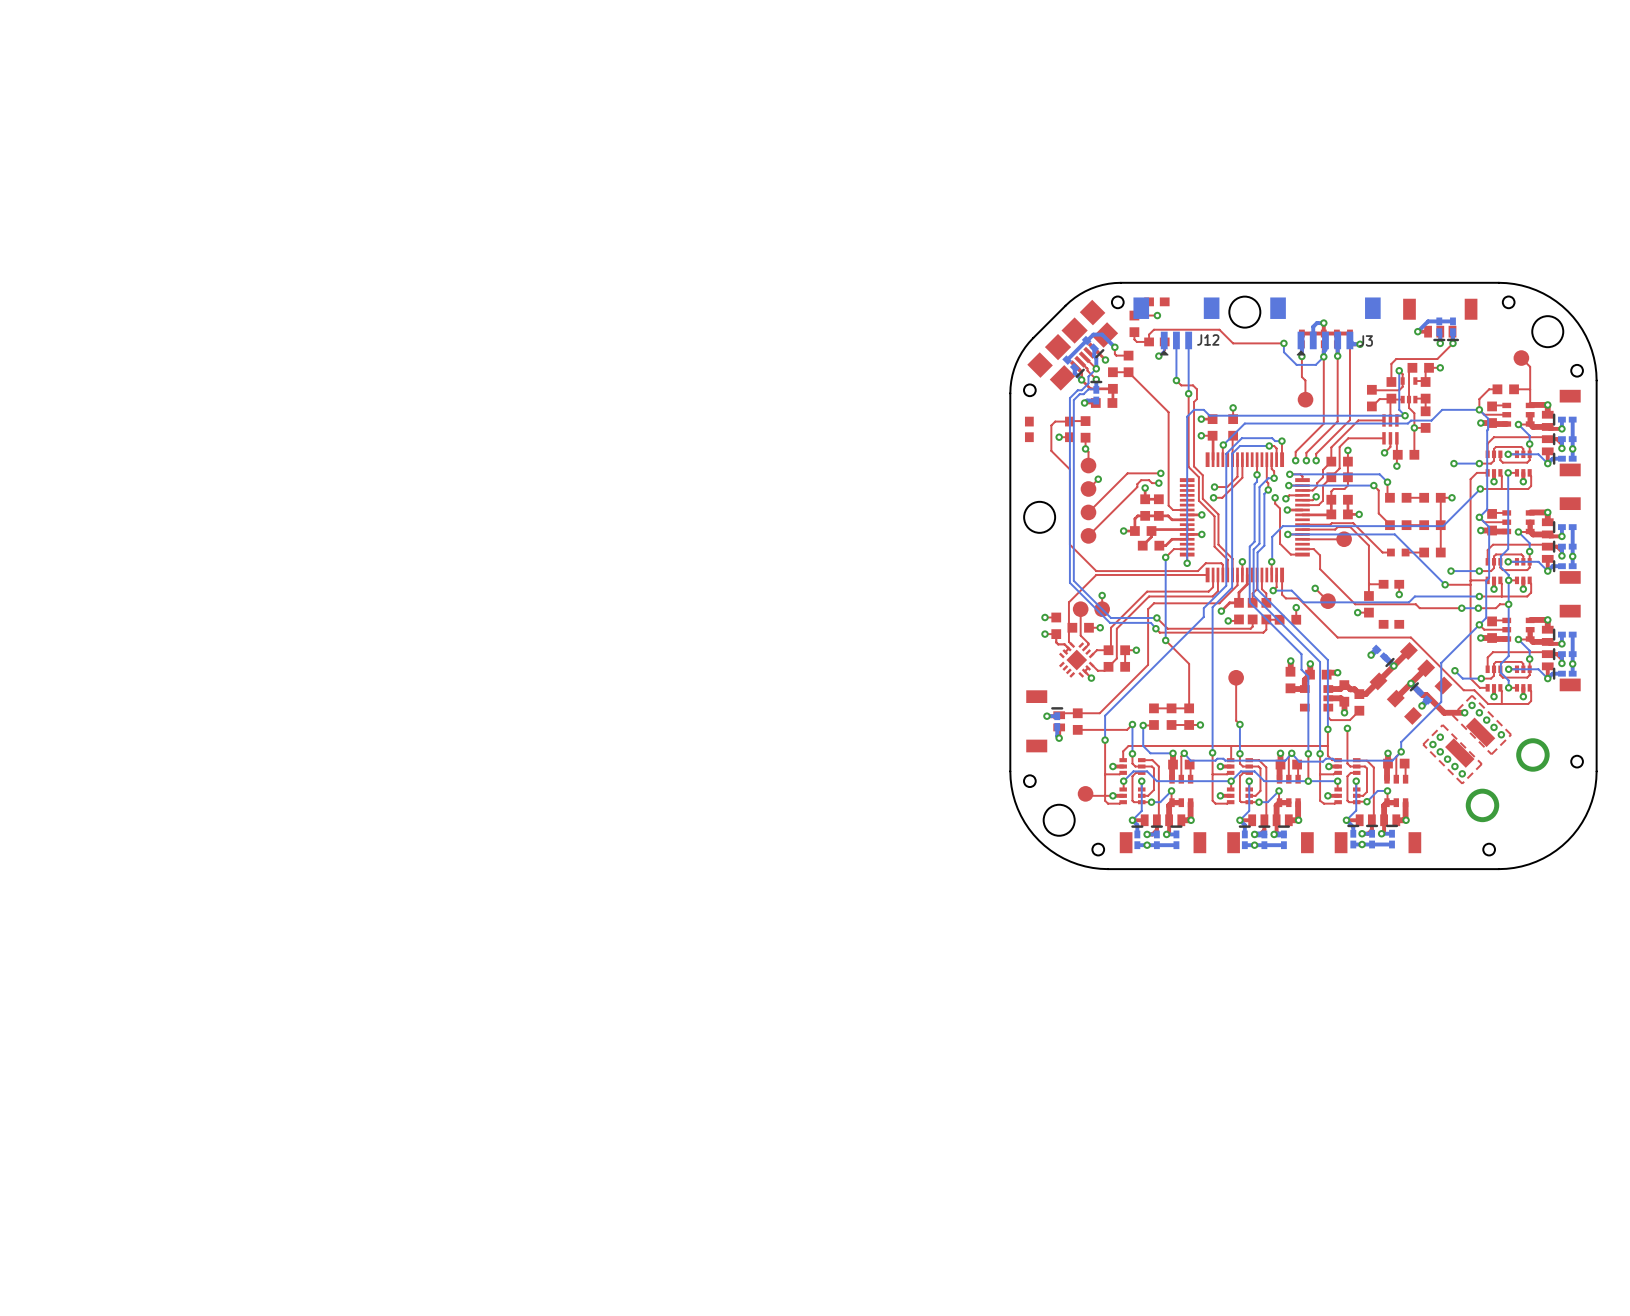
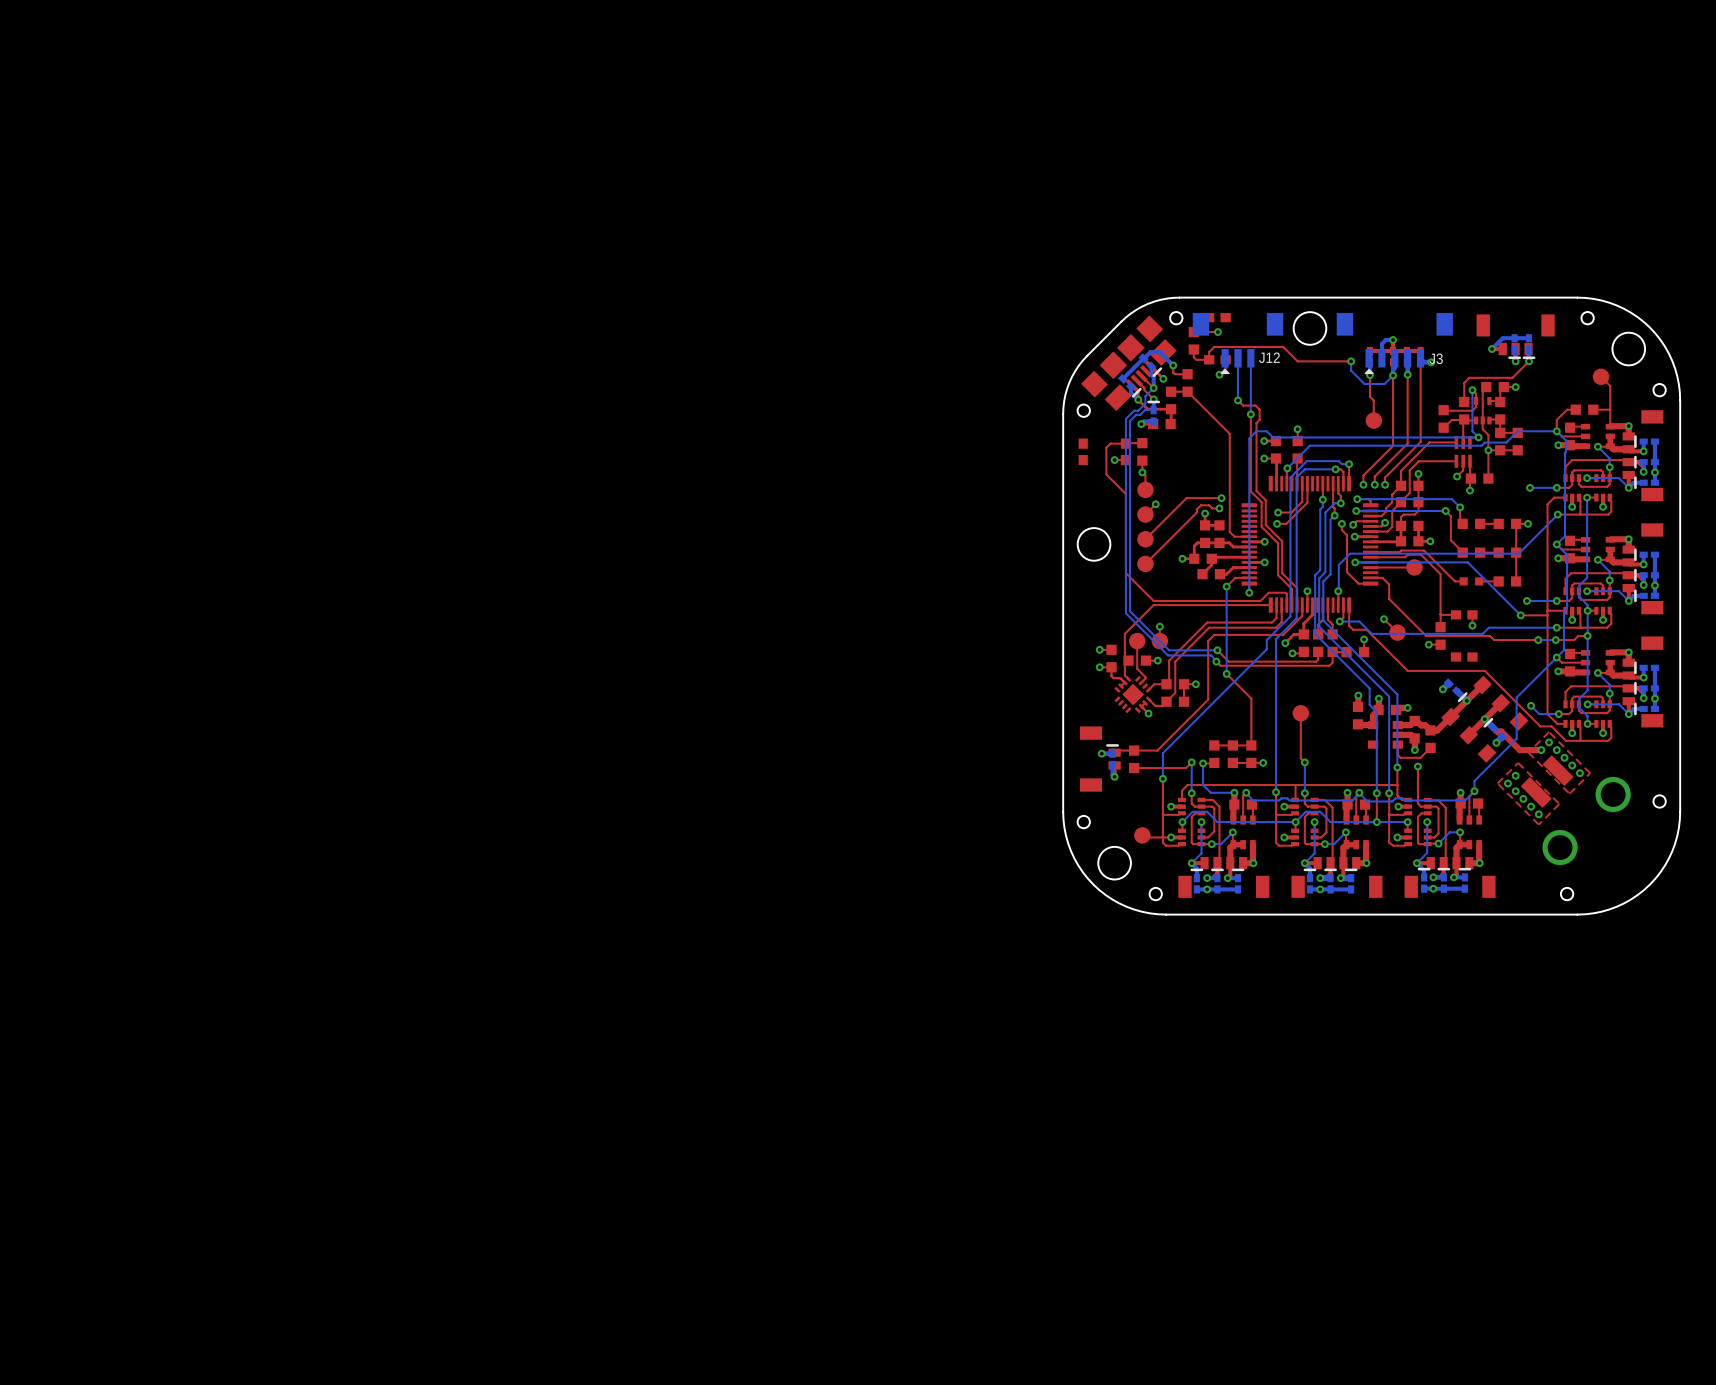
top track: none -> (1517, 432) (1500, 432)
part: none -> (1517, 441)
top track: none -> (1517, 450) (1500, 450)

